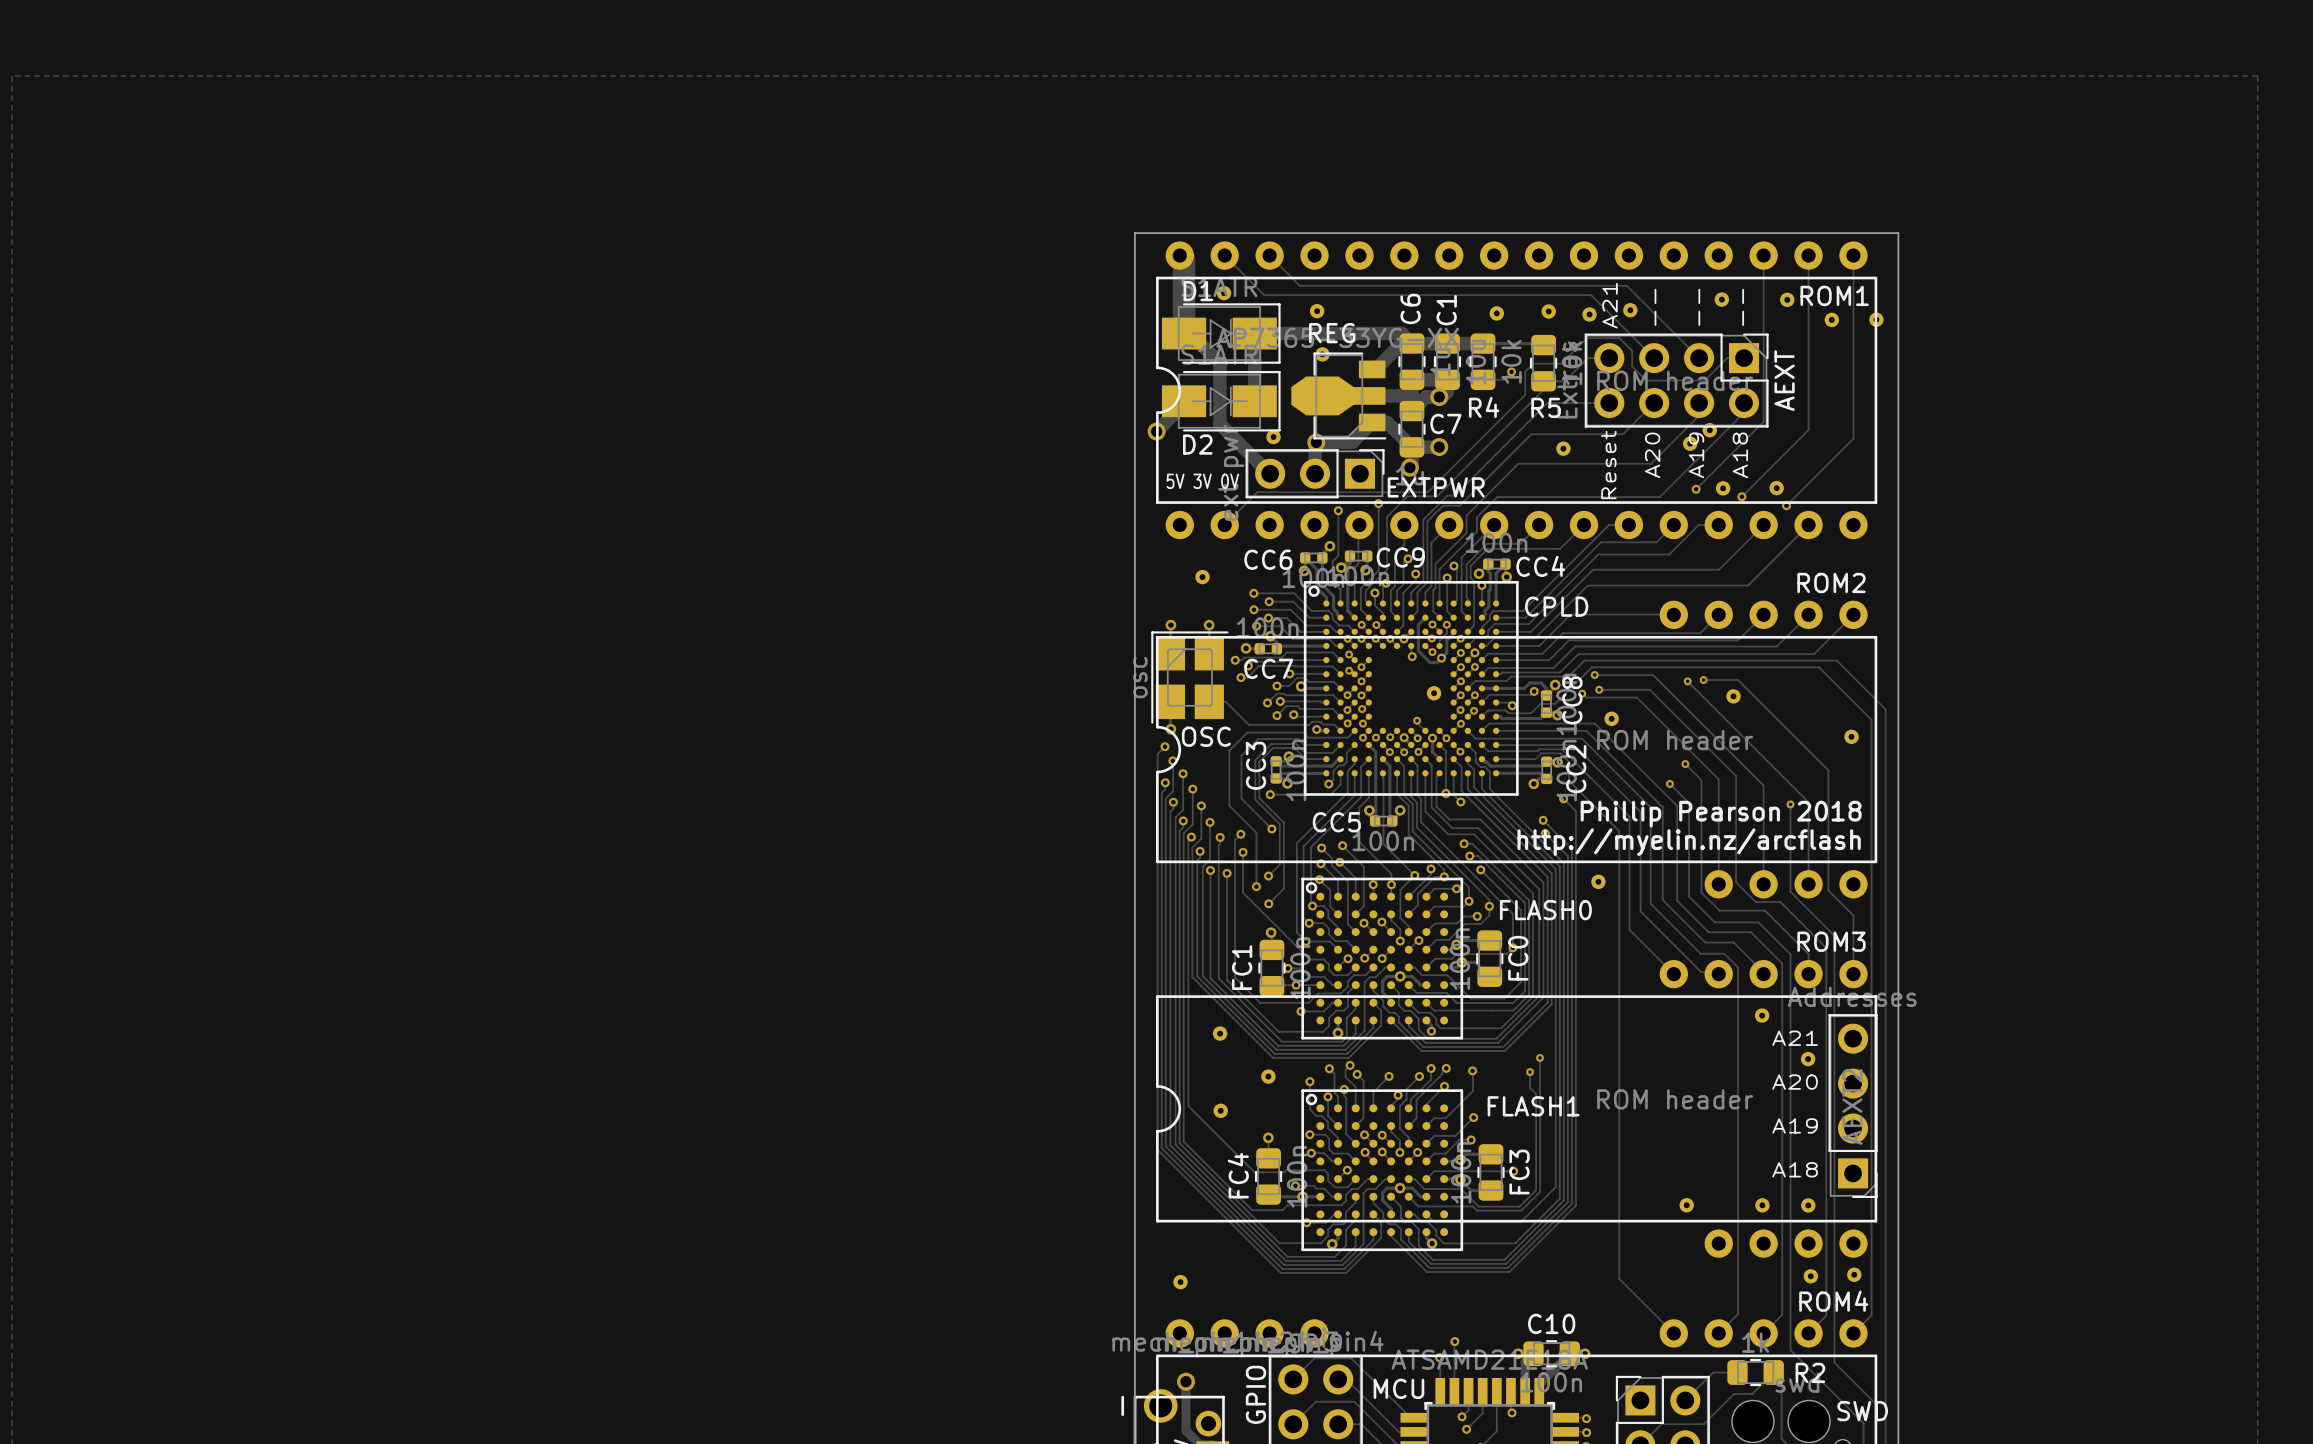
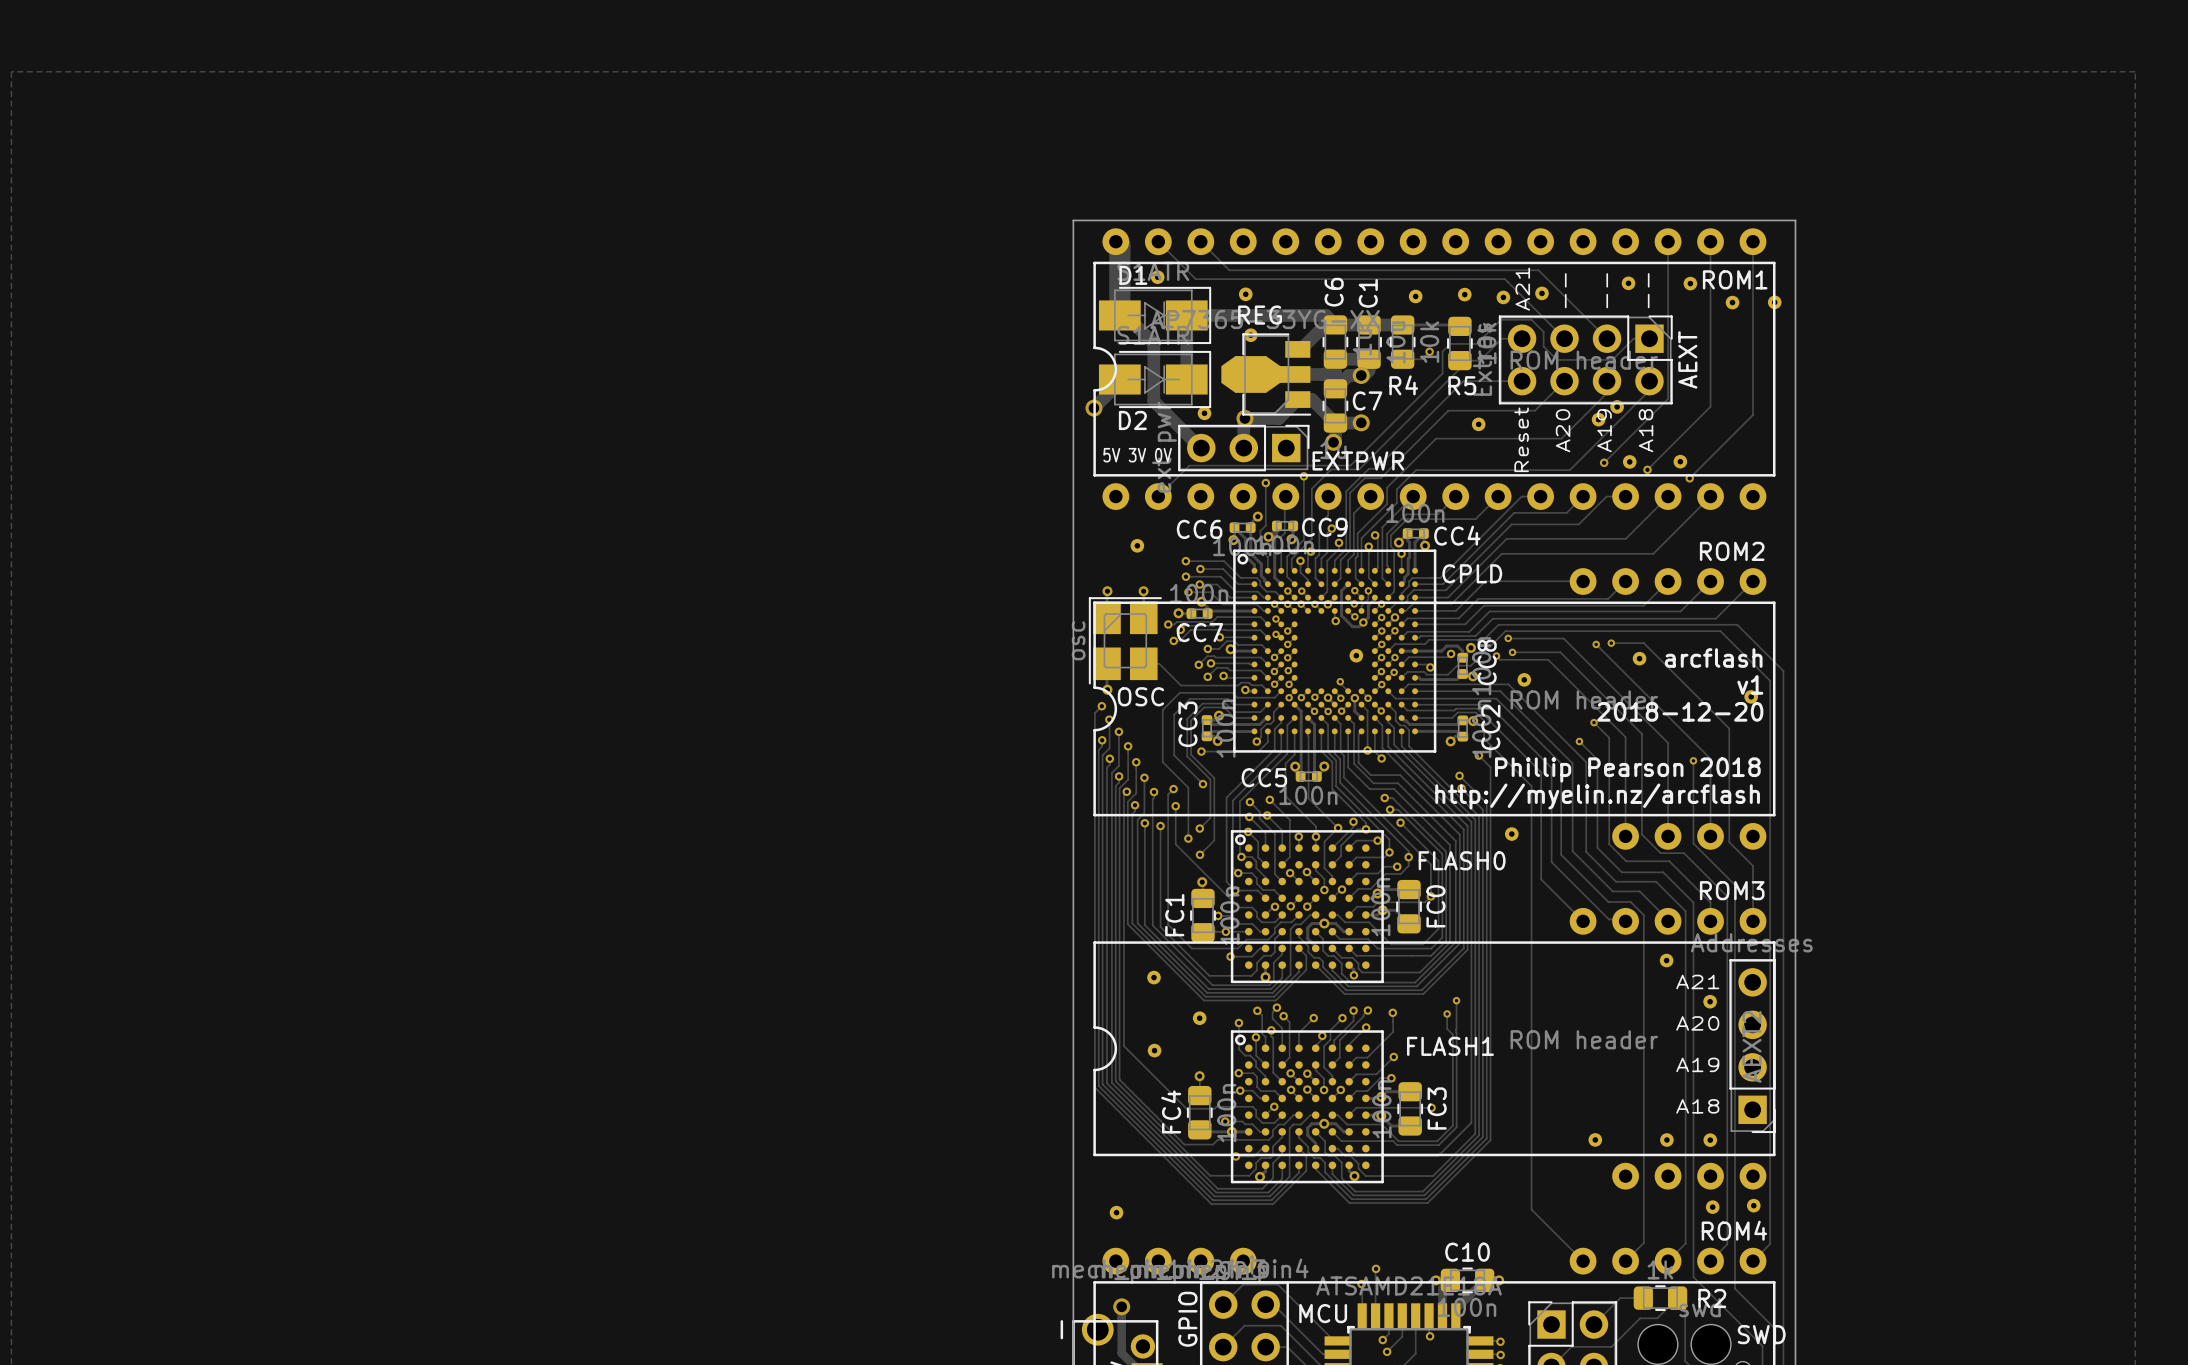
text: none -> arcflash (1713, 658)
text: none -> v1 (1750, 684)
text: none -> 2018-12-20 (1680, 711)

